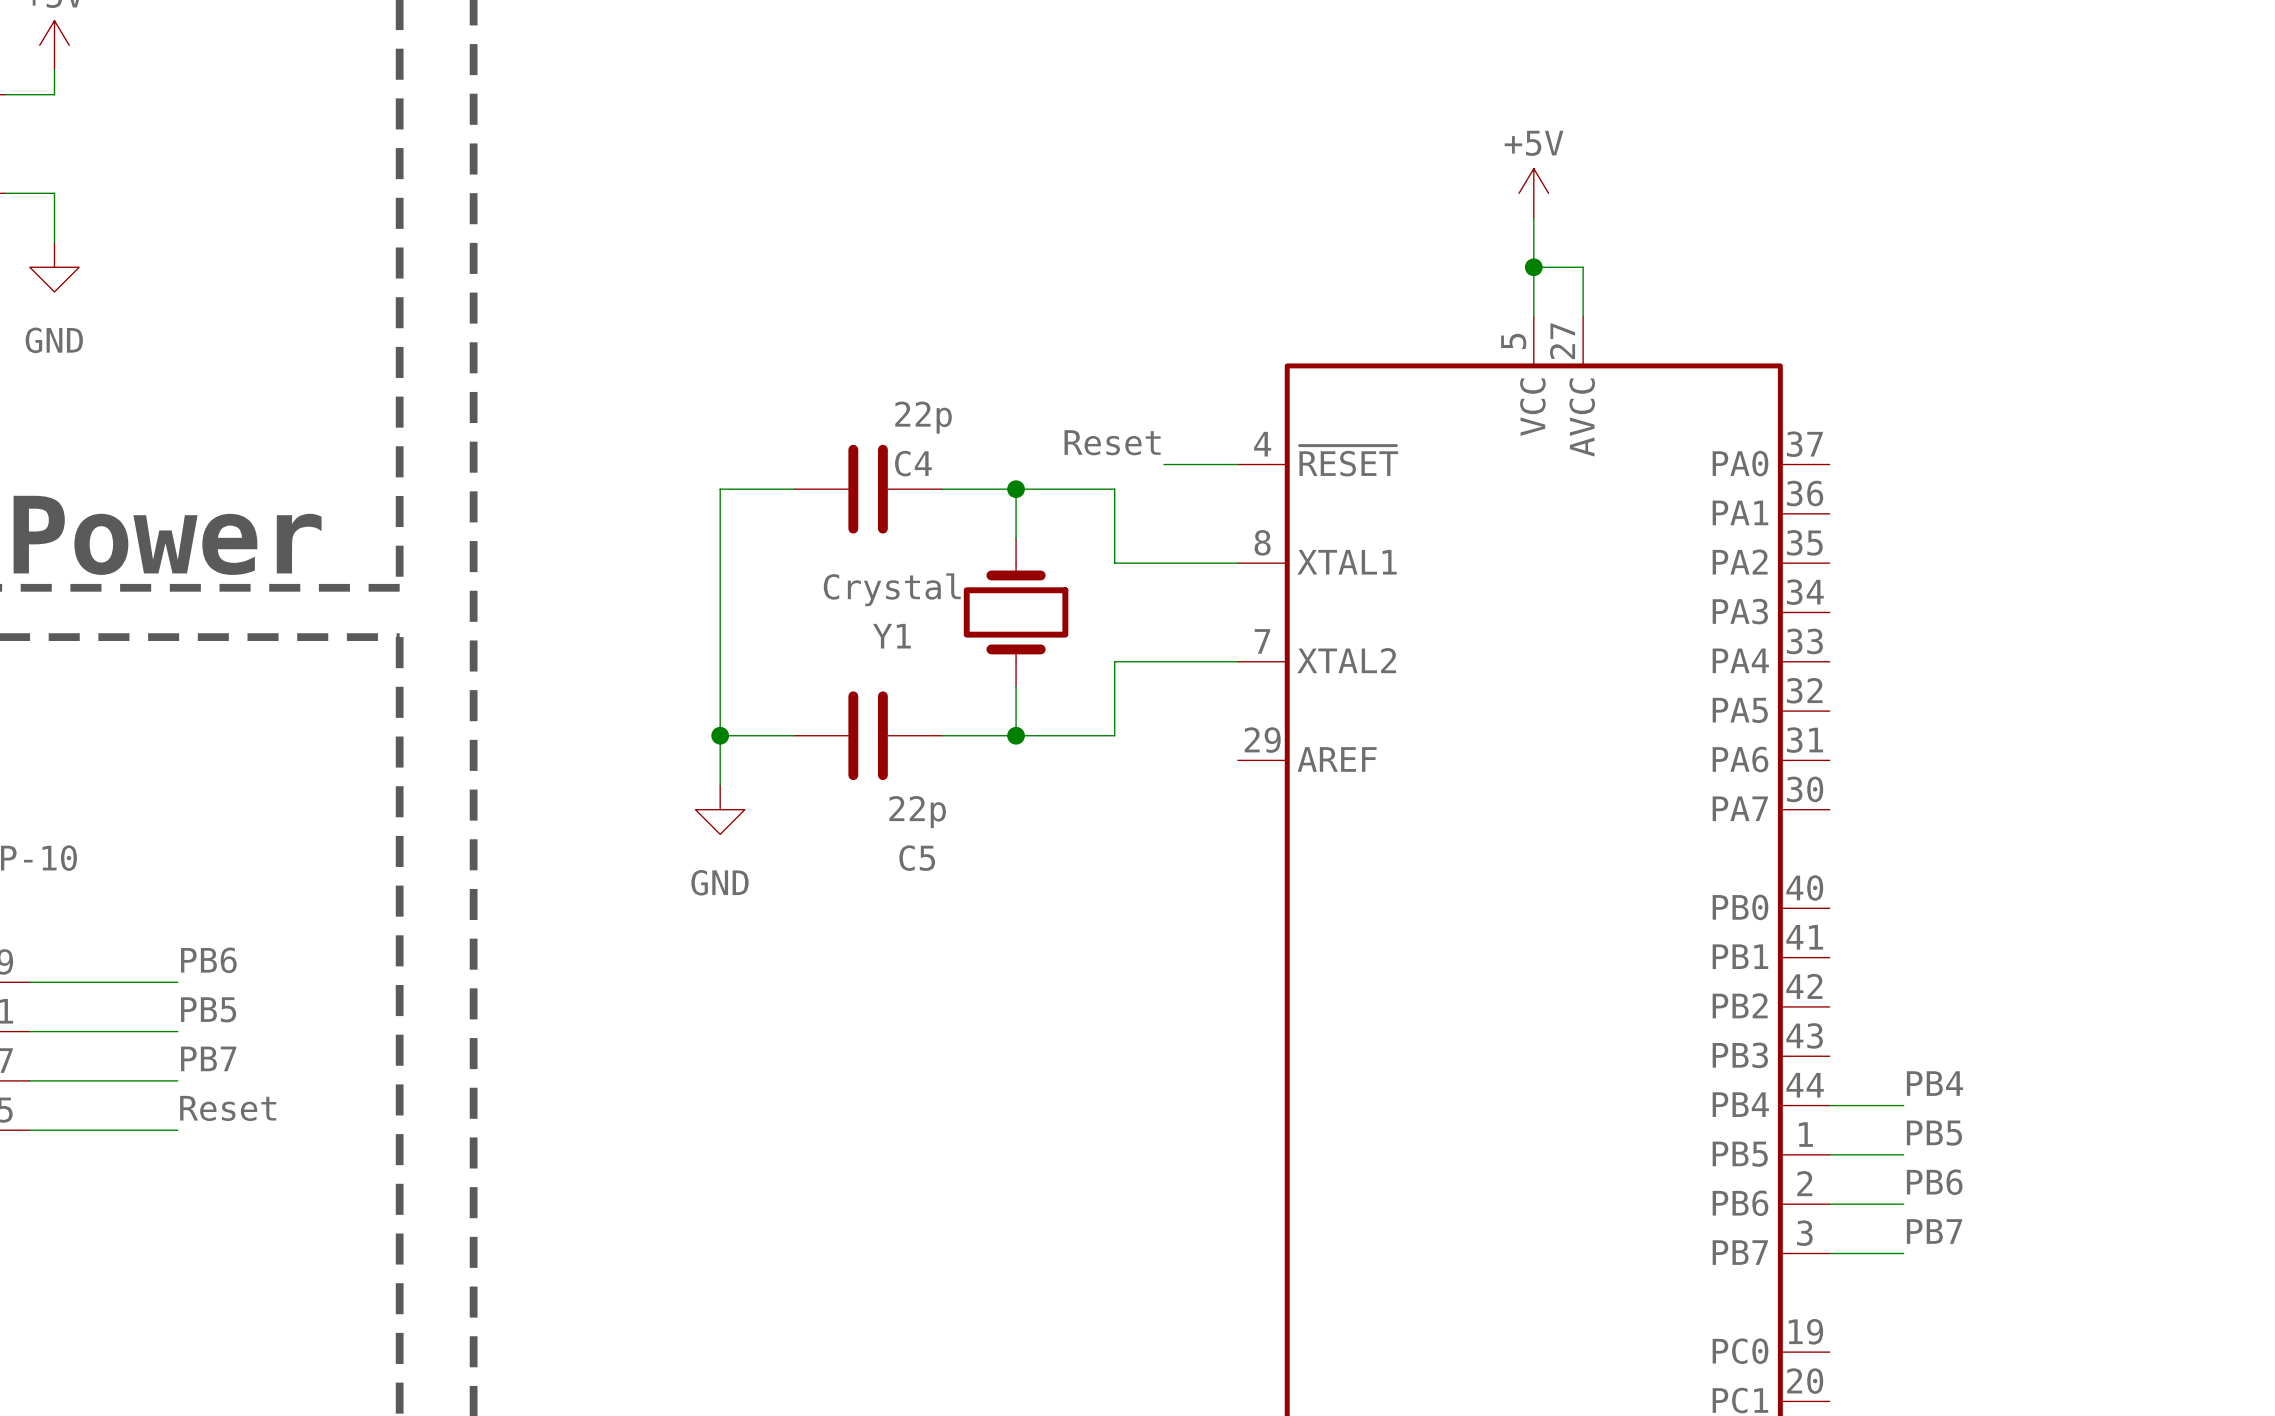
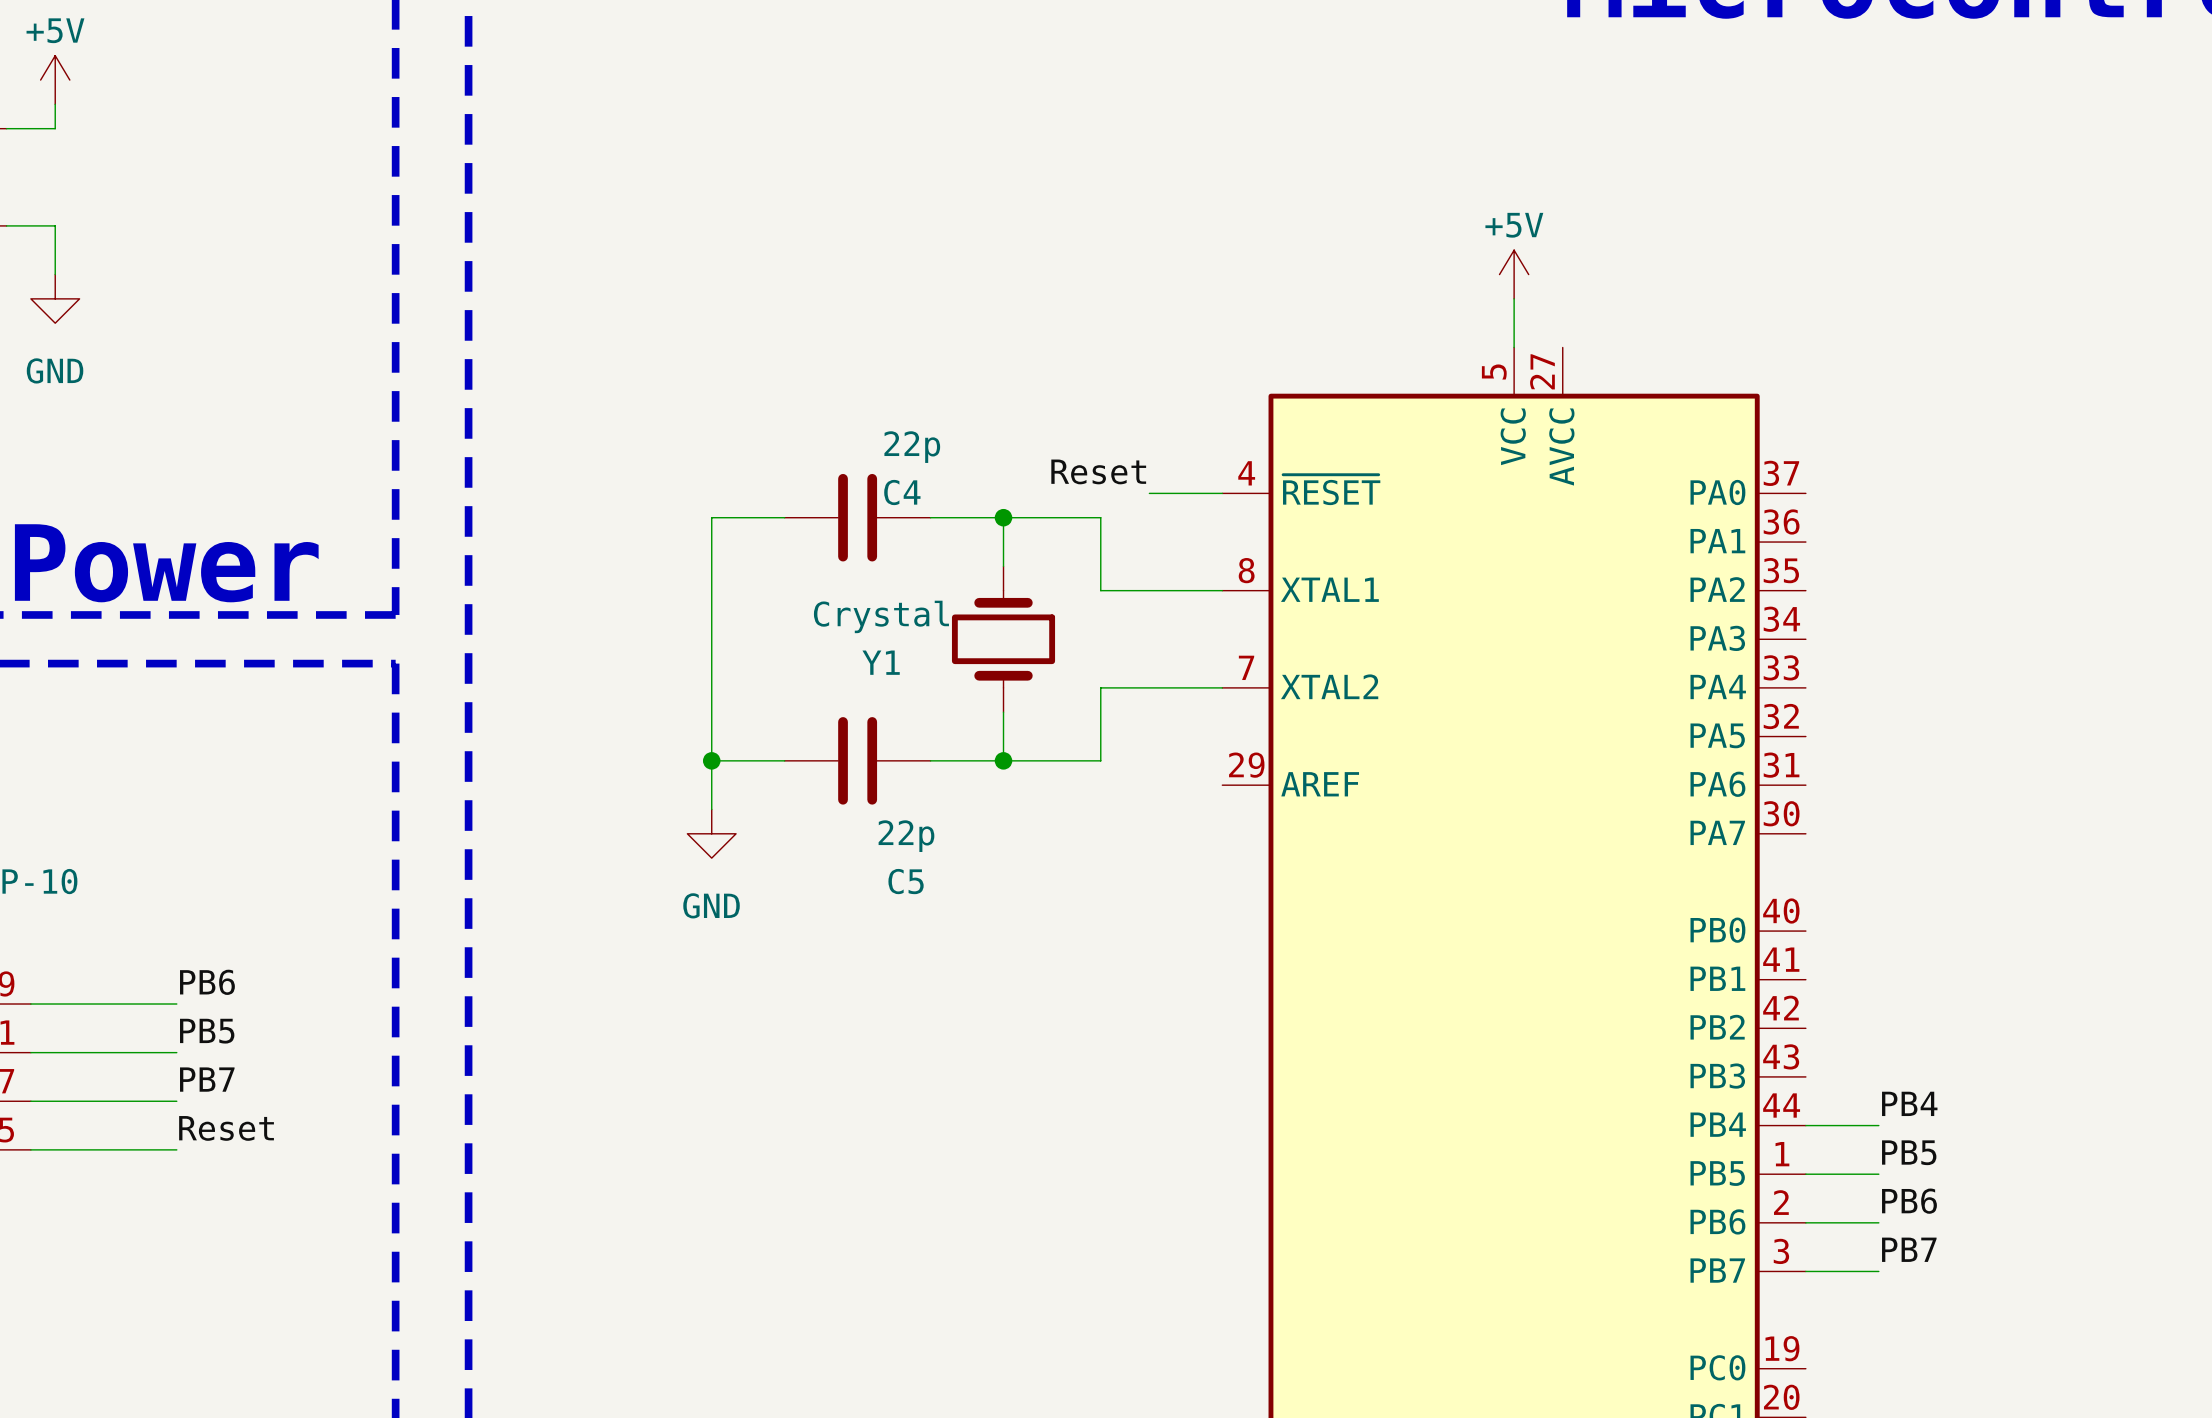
power symbol position: +5V (1533, 193) -> +5V (1514, 274)
wire: (1533, 217) (1533, 267) (1583, 267) (1583, 316) -> none
junction: (1533, 267) -> none

